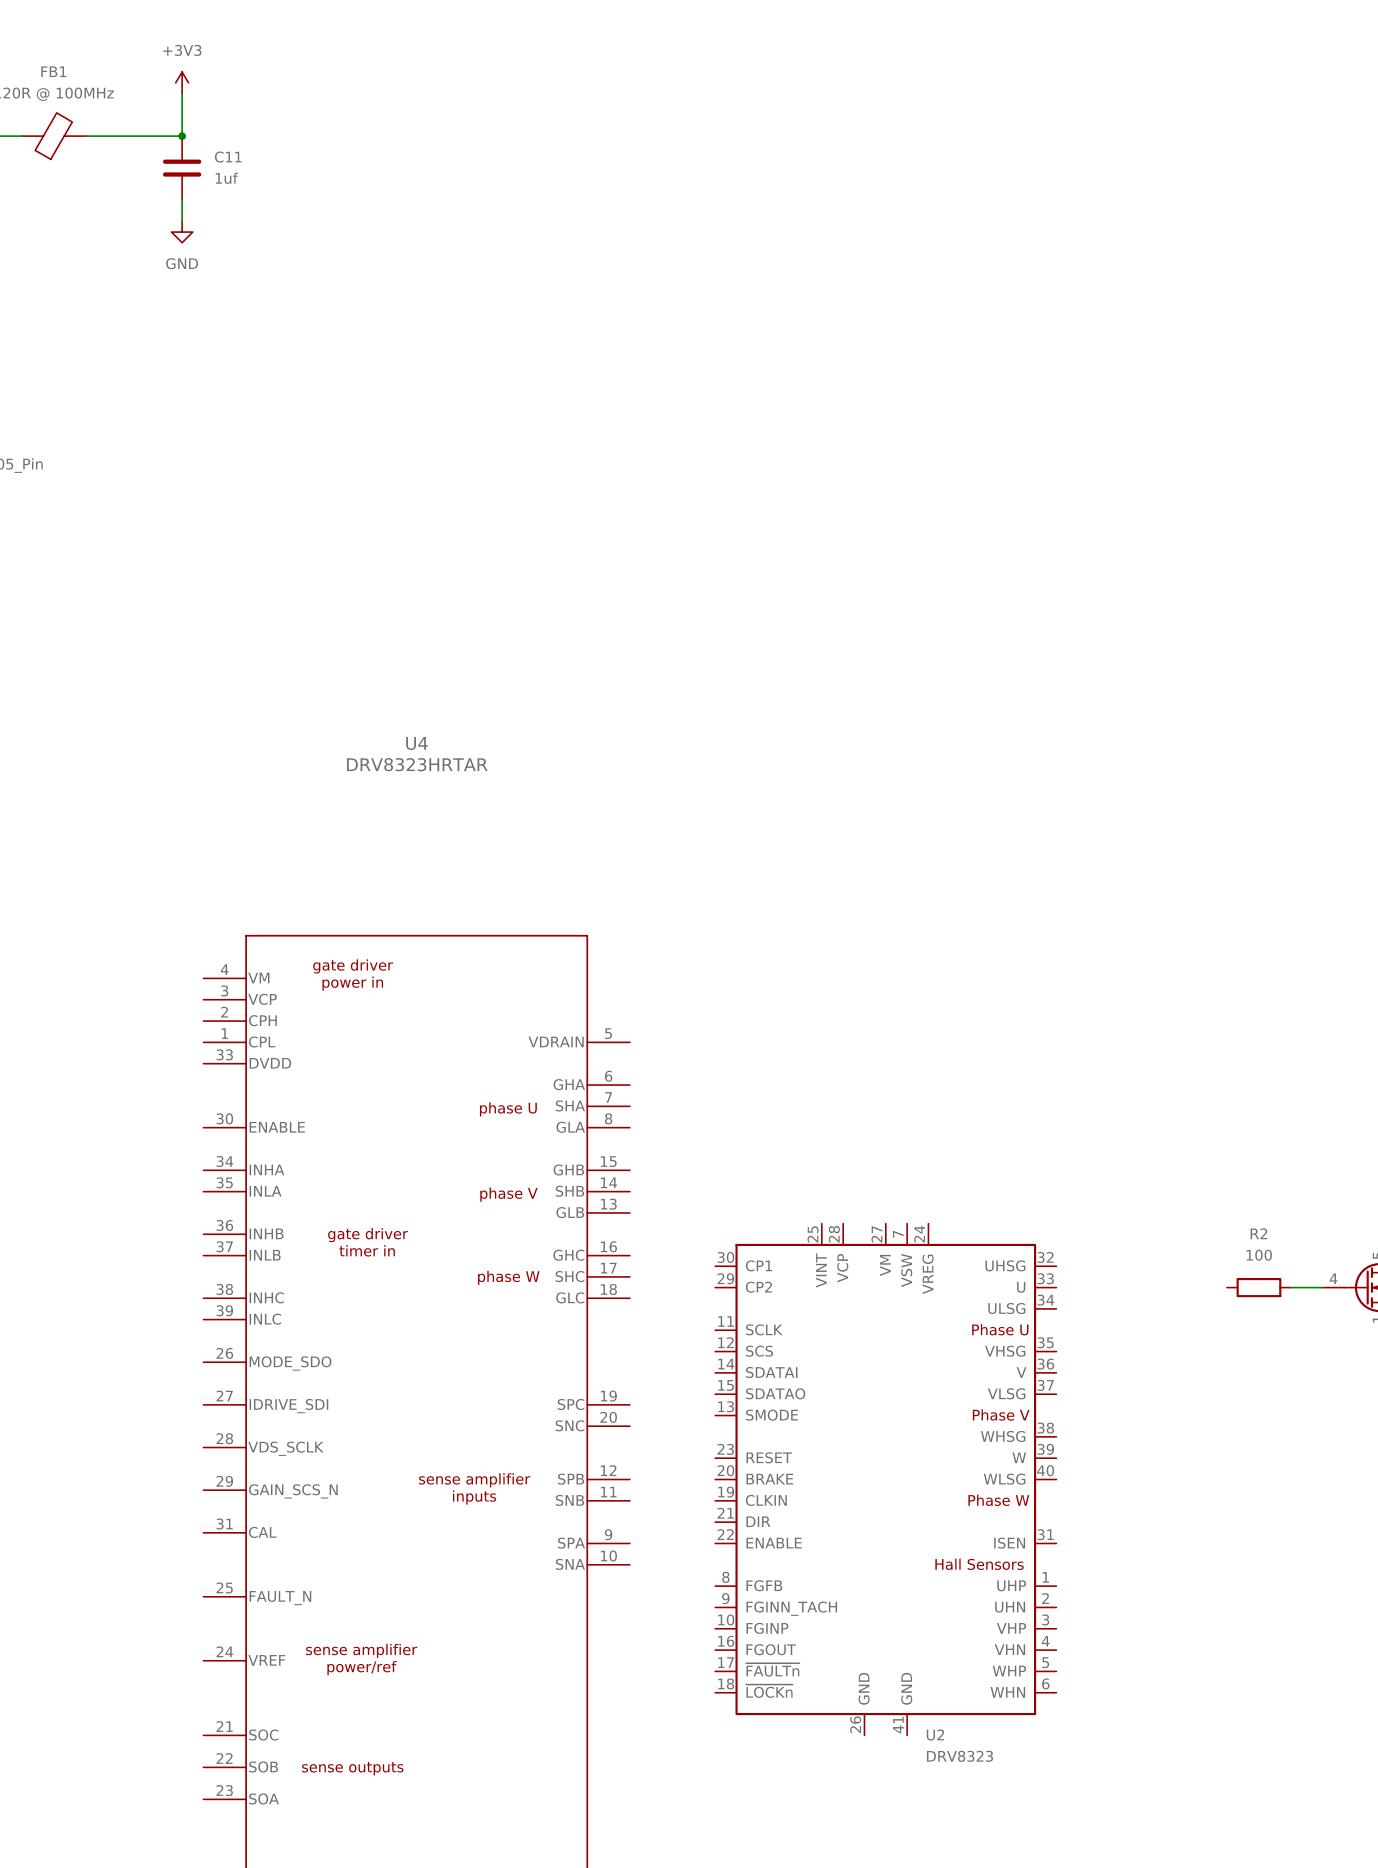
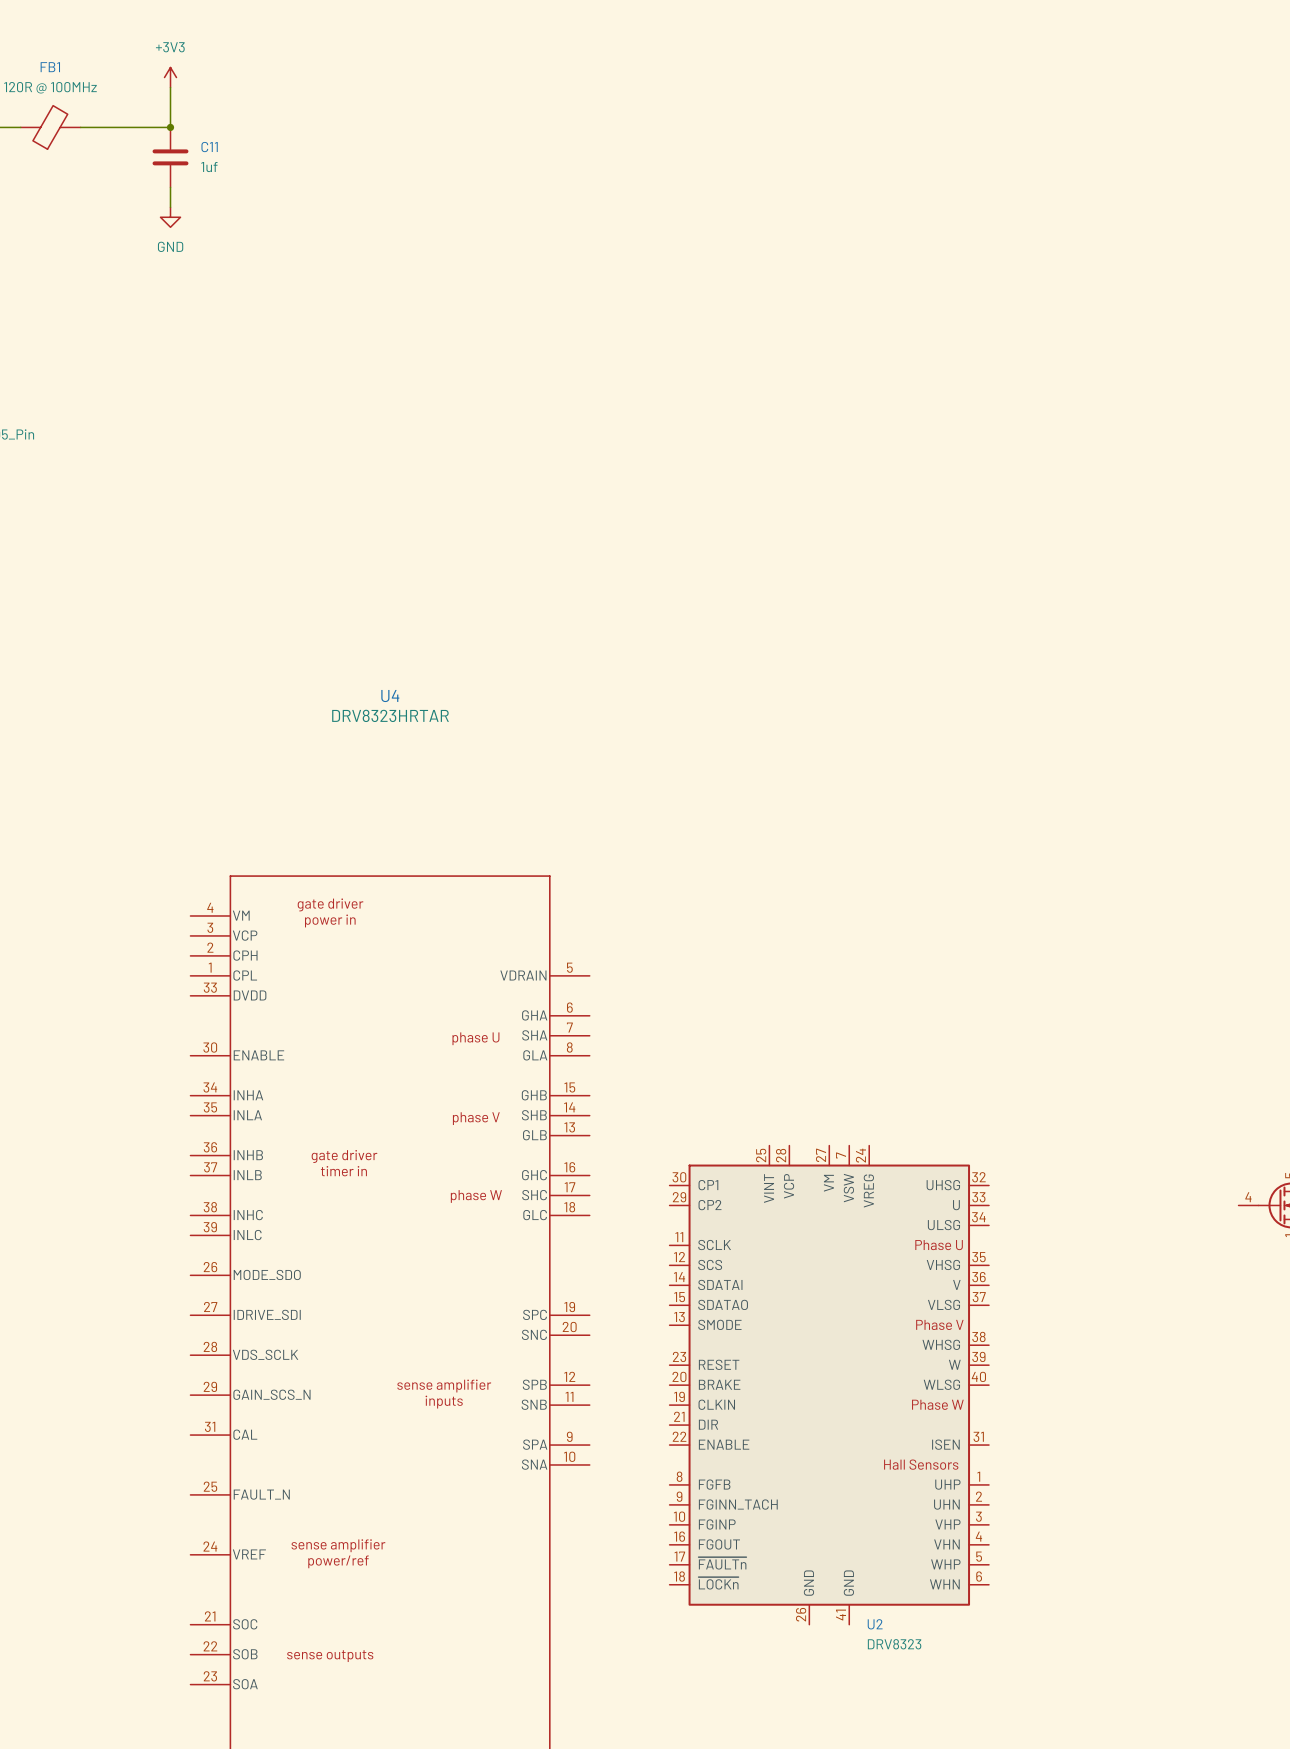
R2: 100 (1258, 1287) -> none
wire: (1290, 1287) (1322, 1287) -> none

